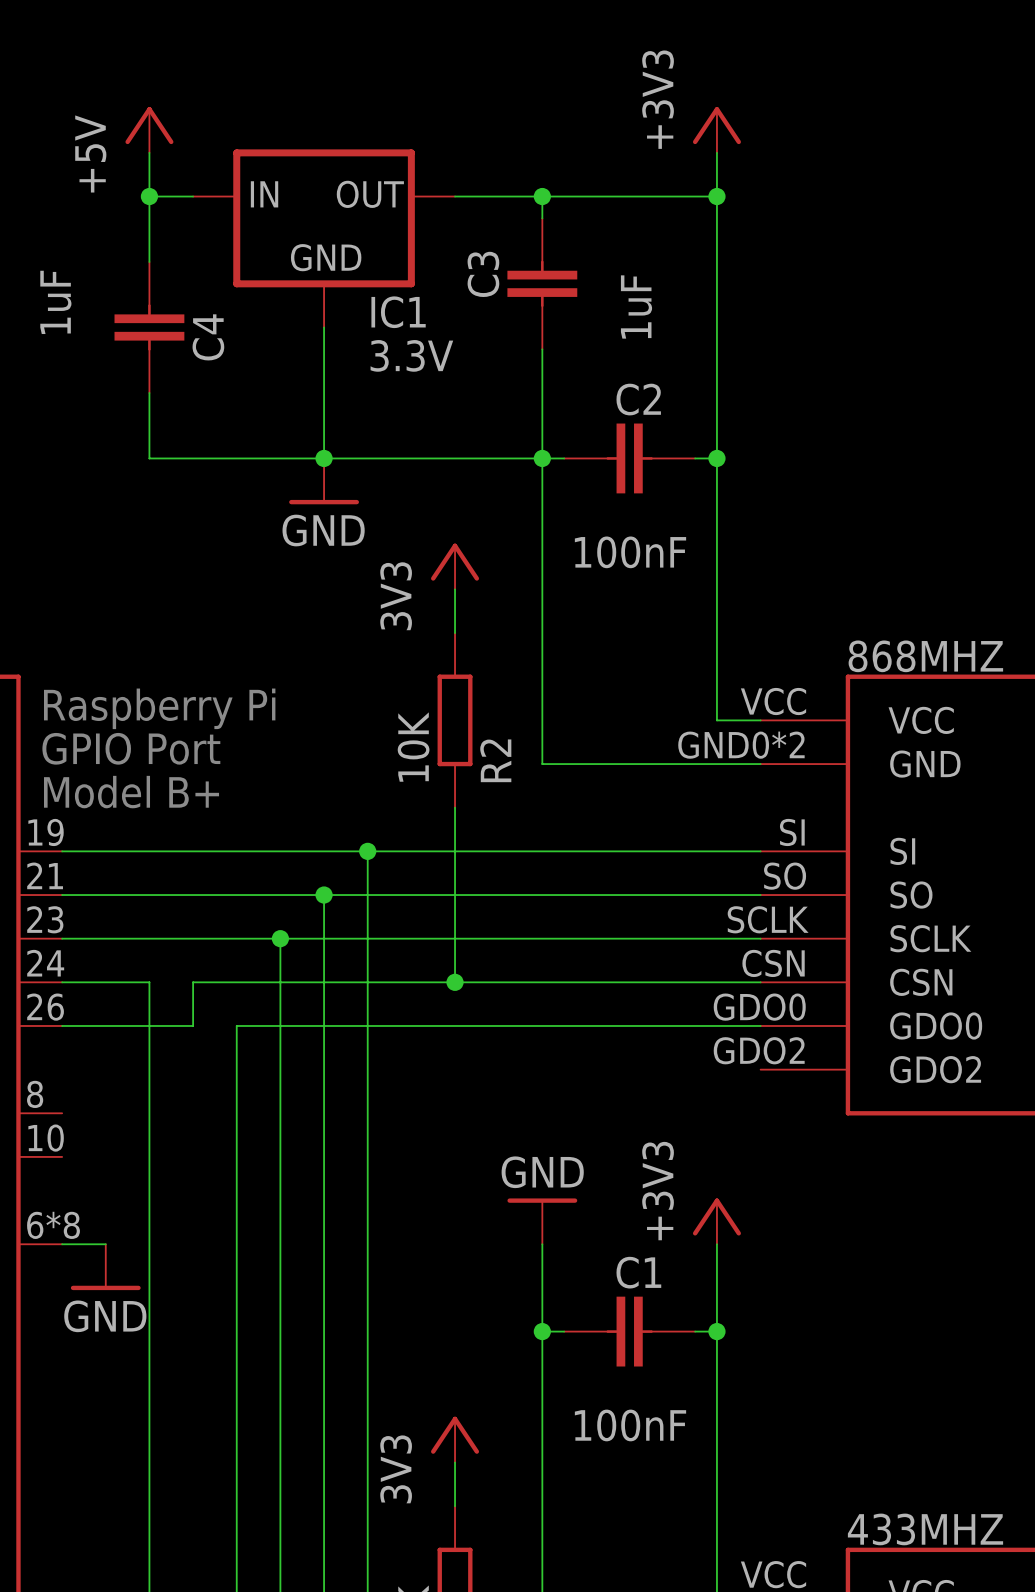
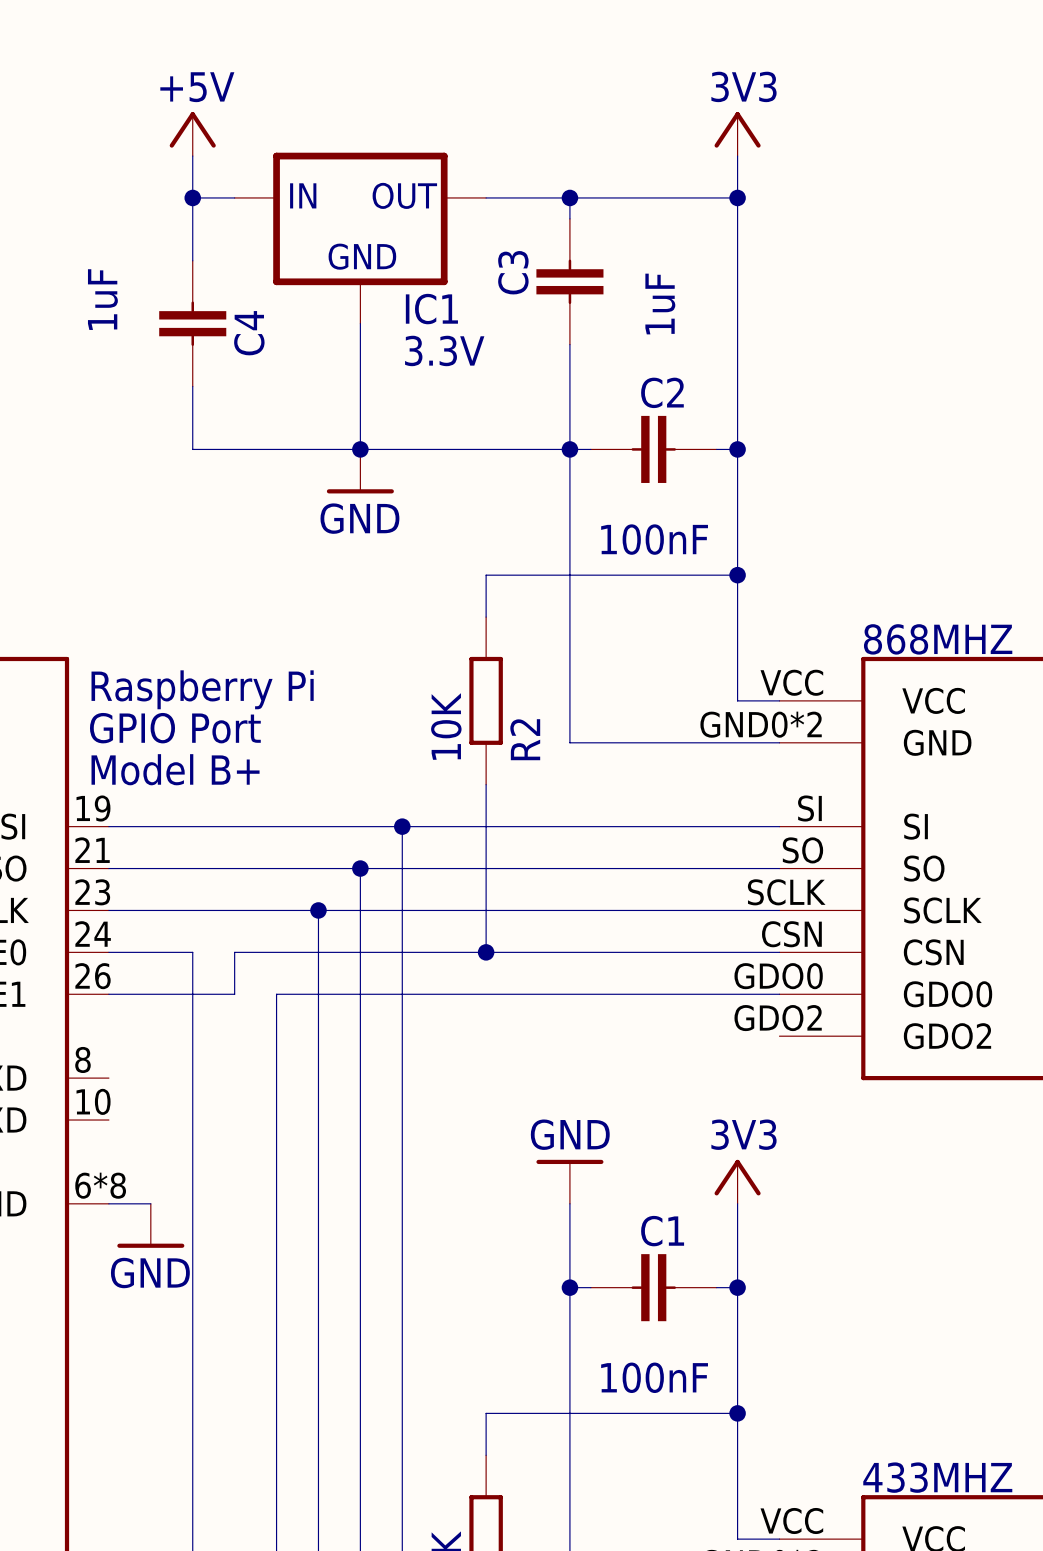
power symbol: +3V3 (716, 129) -> 3V3 (737, 134)
power symbol text rotation: 0° (90, 153) -> 90° clockwise (197, 87)
power symbol: 3V3 (455, 566) -> none
wire: none -> (486, 575) (737, 575)
junction: none -> (737, 575)
power symbol: +3V3 (716, 1221) -> 3V3 (737, 1181)
power symbol: 3V3 (455, 1439) -> none
wire: none -> (486, 1413) (737, 1413)
junction: none -> (737, 1413)

